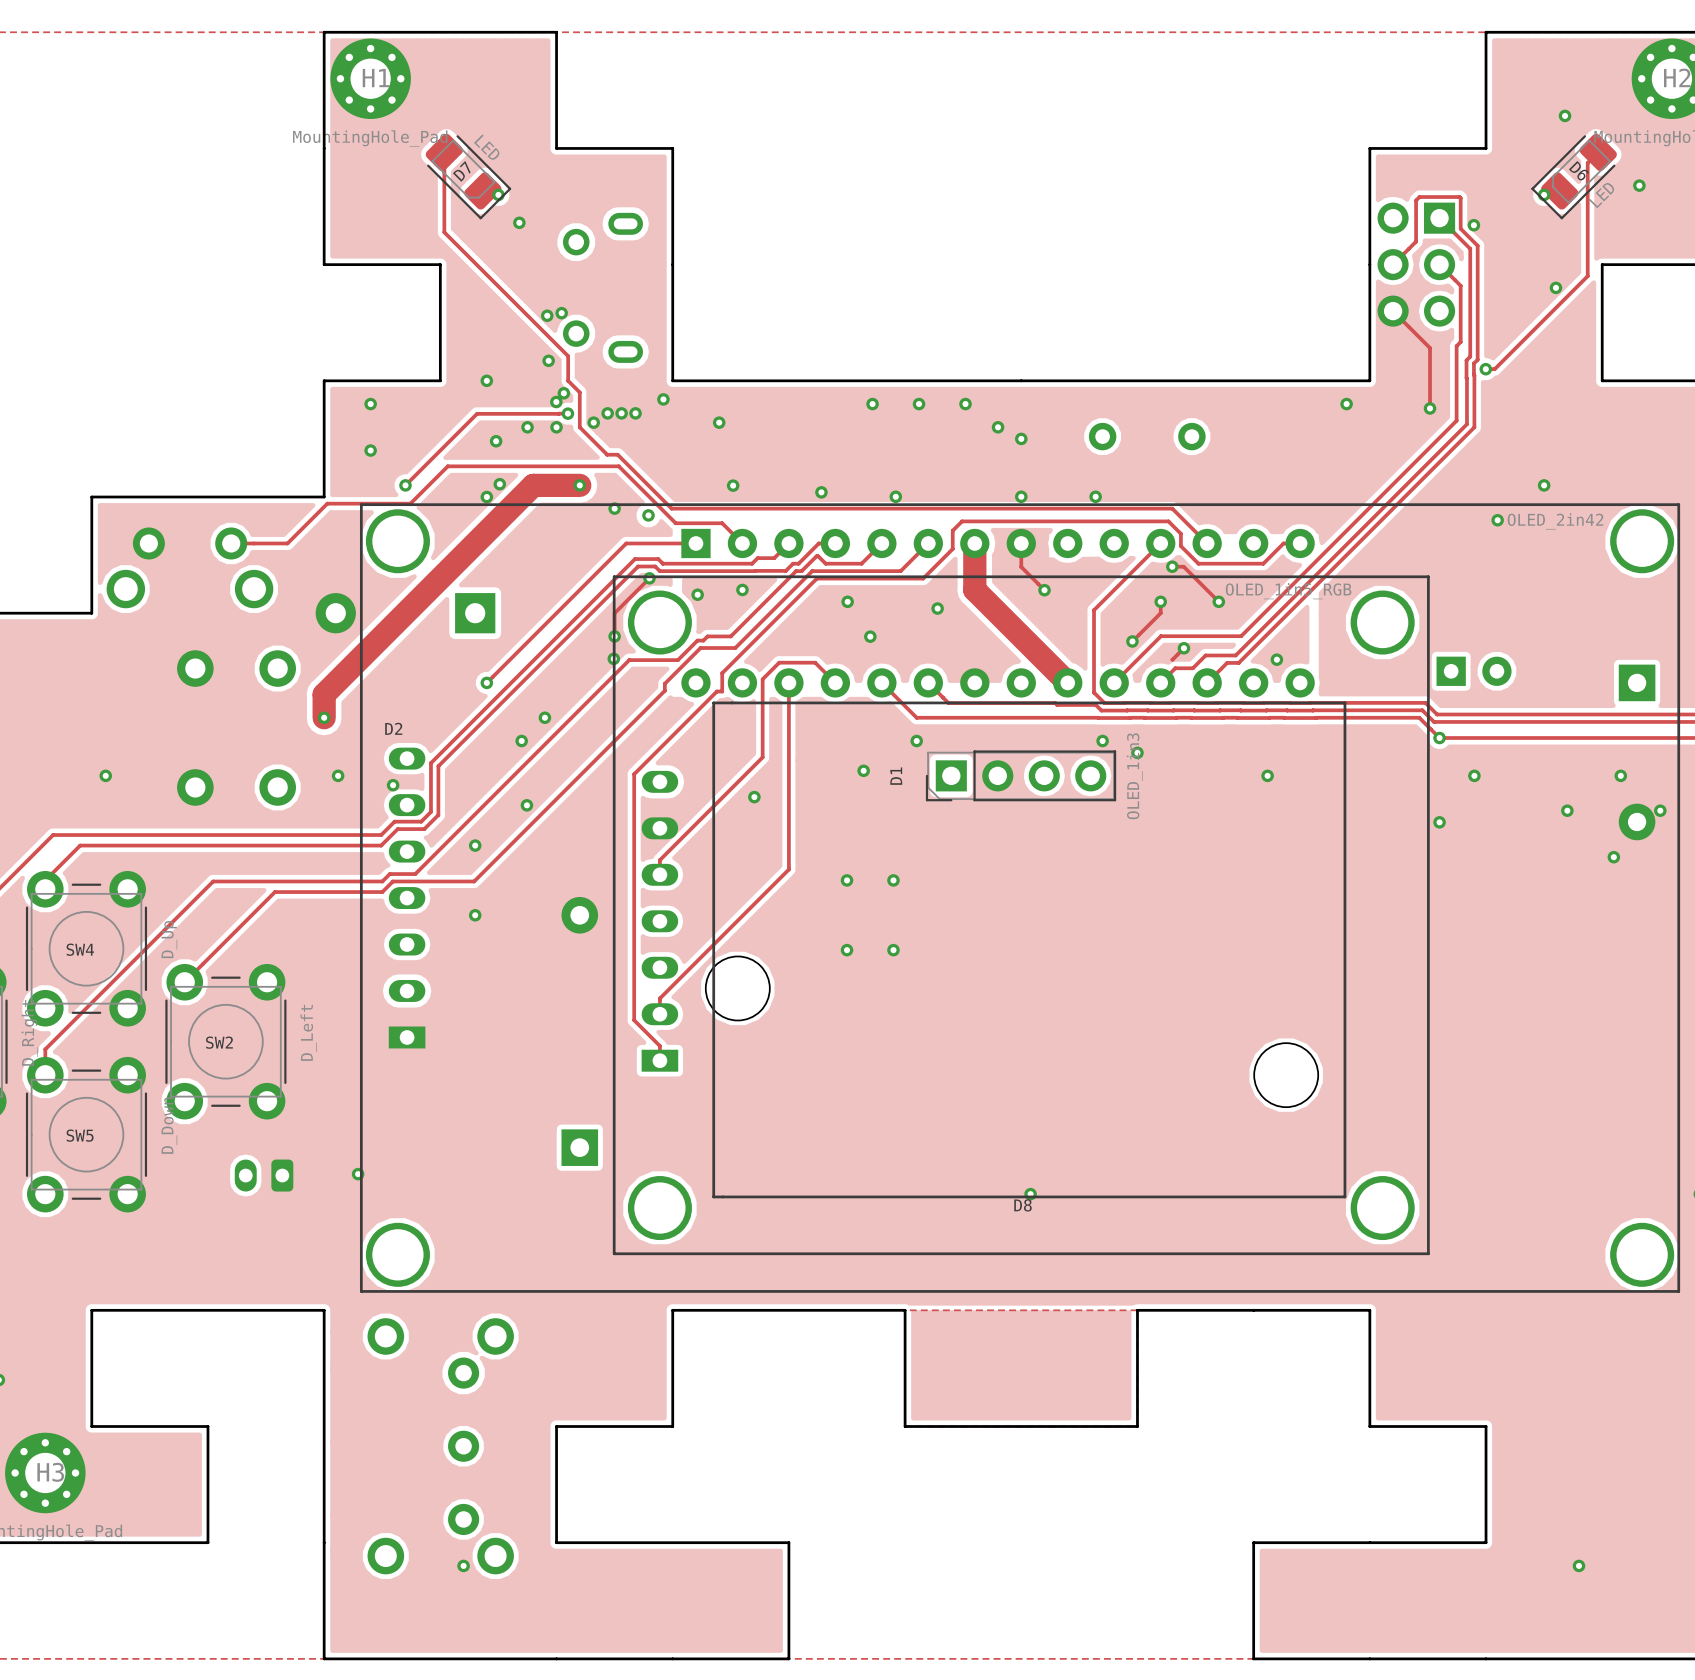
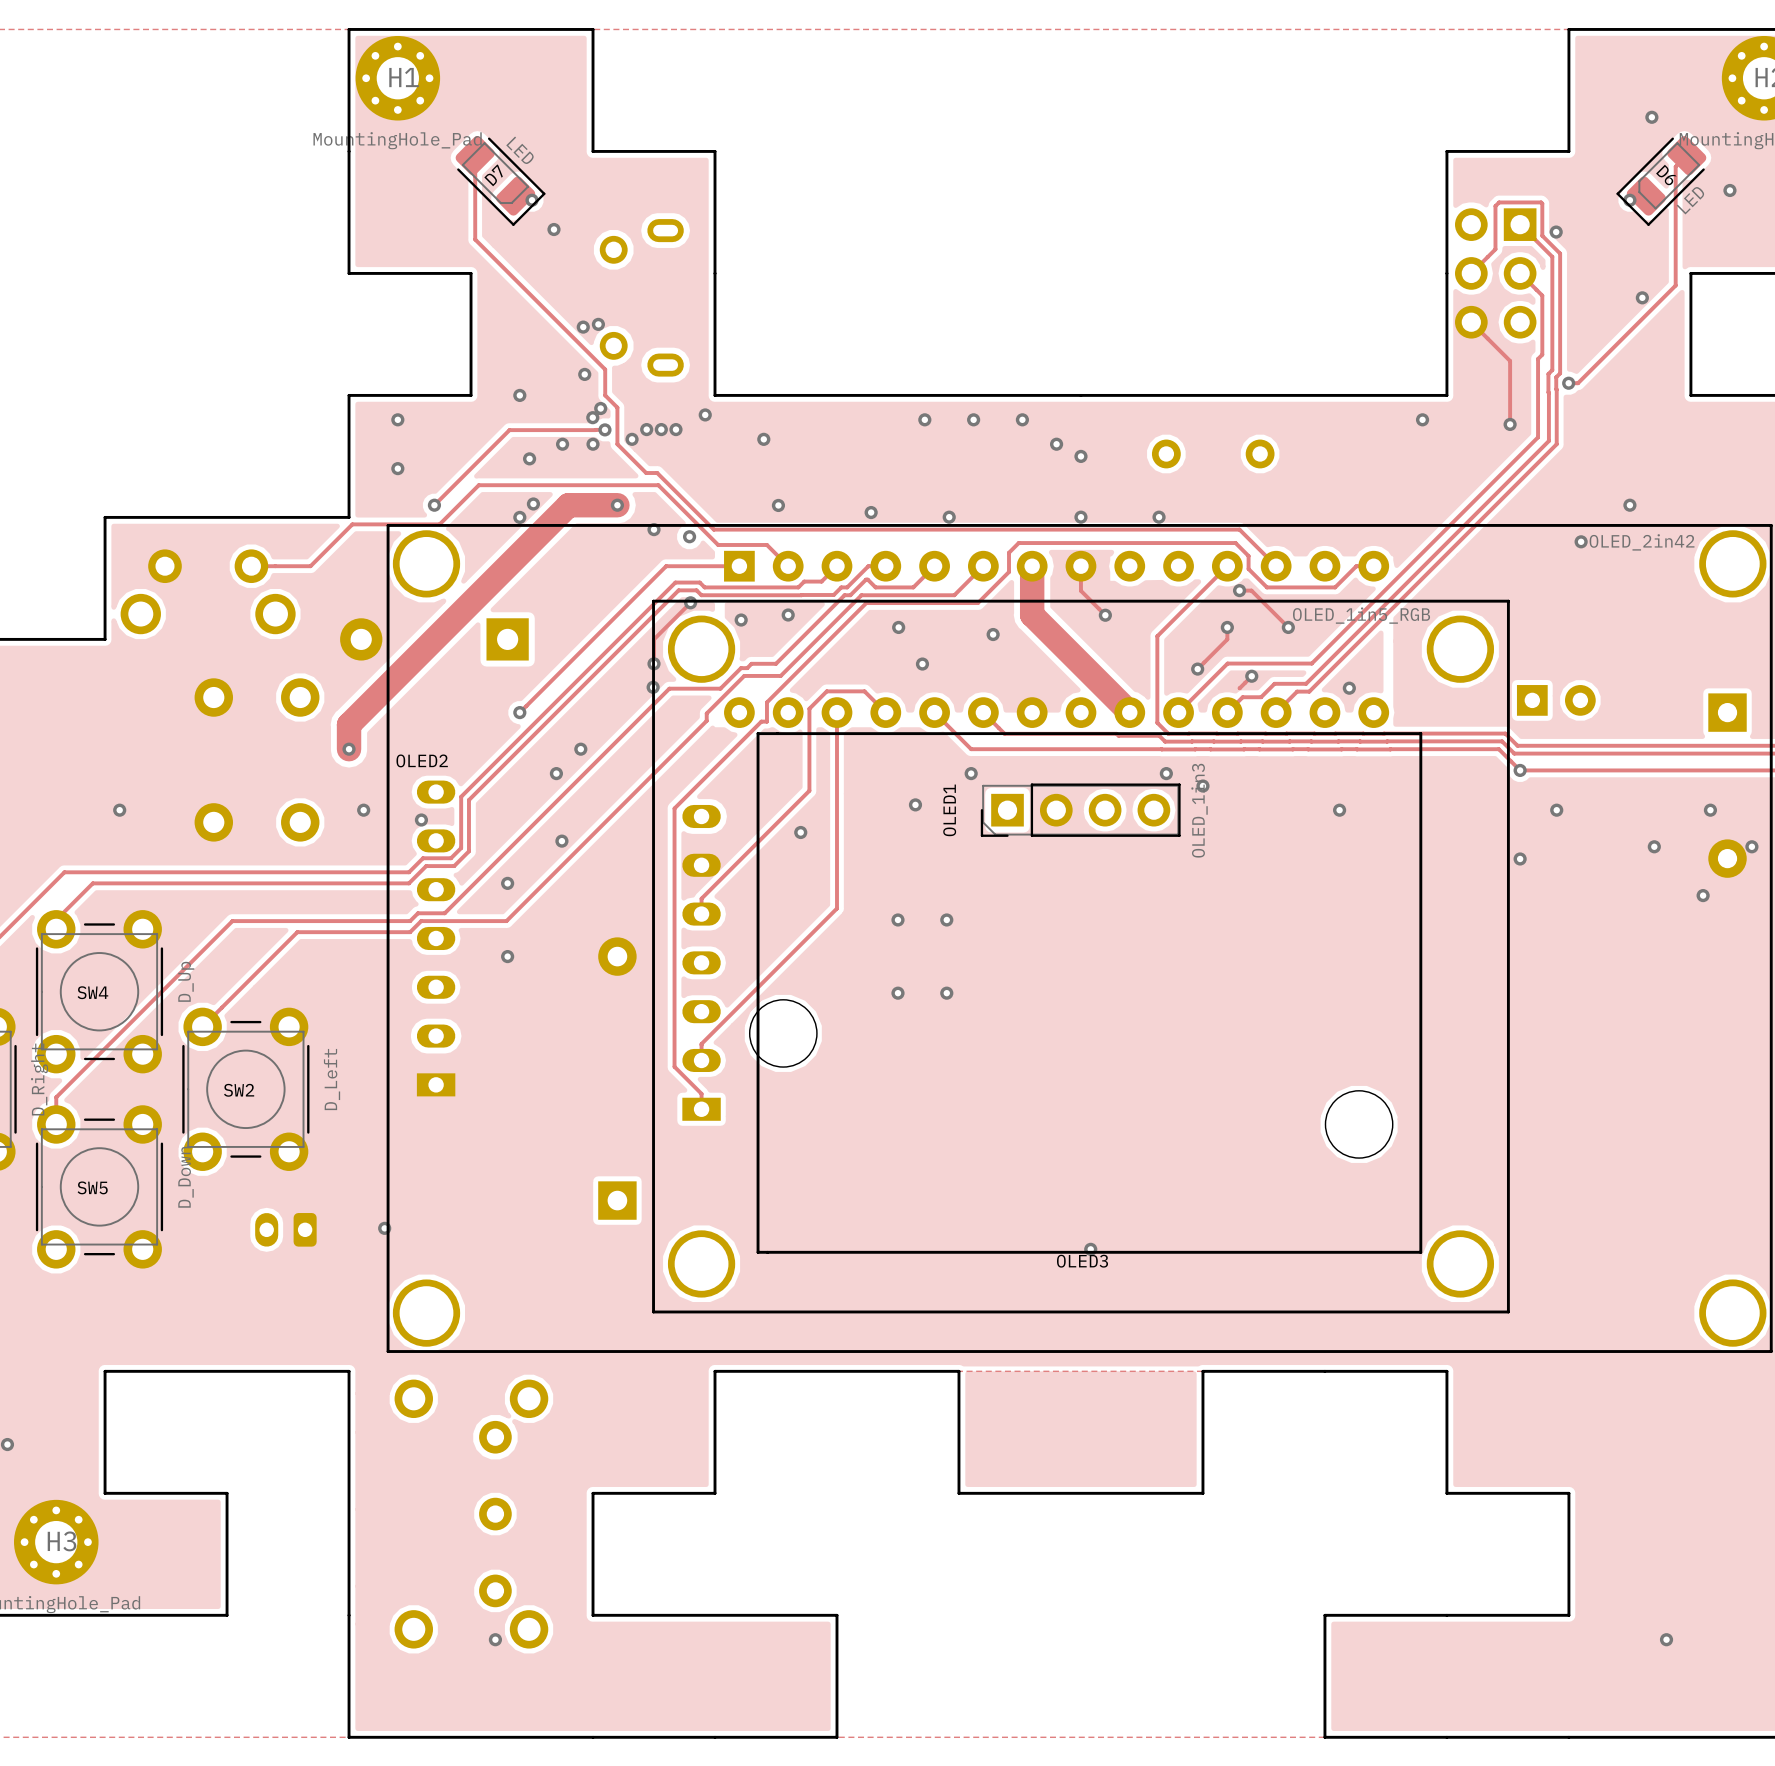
D2 name: D2 (393, 728) -> OLED2 (422, 760)
D1 name: D1 (896, 776) -> OLED1 (949, 810)
D8 name: D8 (1022, 1205) -> OLED3 (1082, 1261)

